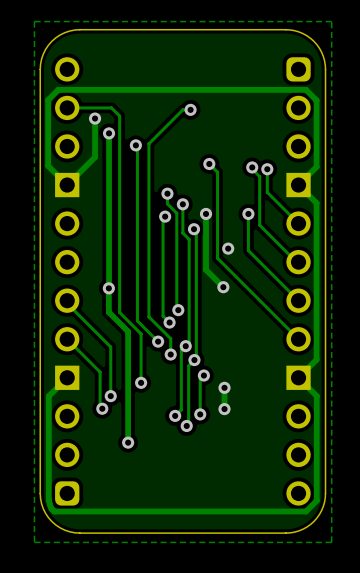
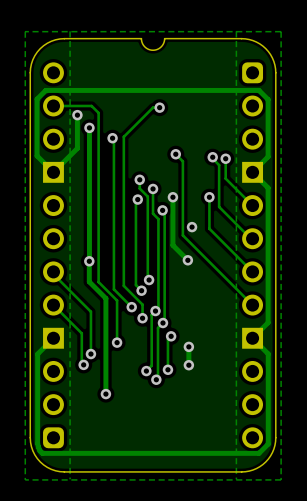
zone outline: none -> (70, 31) (70, 479)
zone outline: none -> (236, 31) (236, 479)
part footprint: [39, 28, 327, 534] -> [29, 37, 277, 473]

